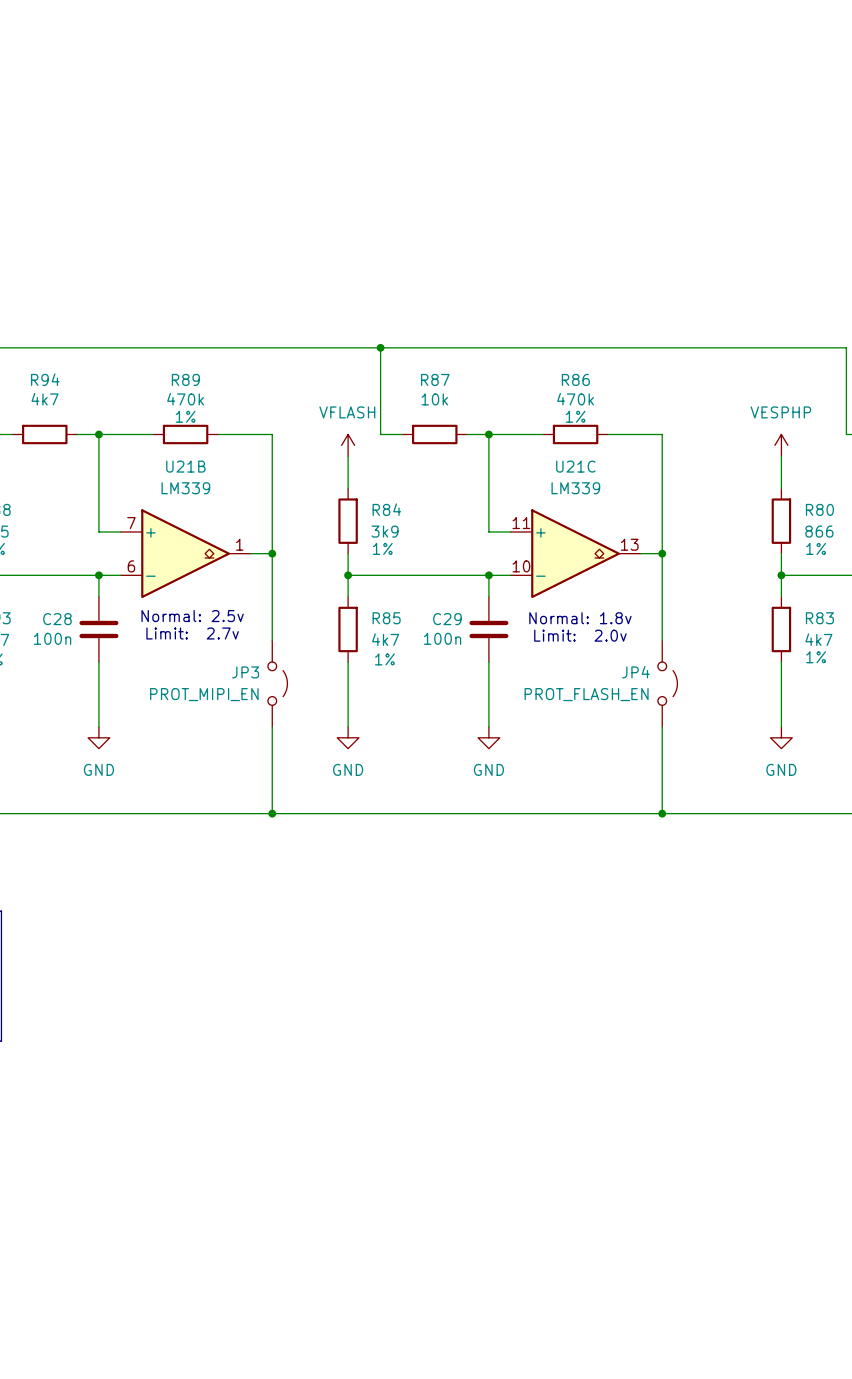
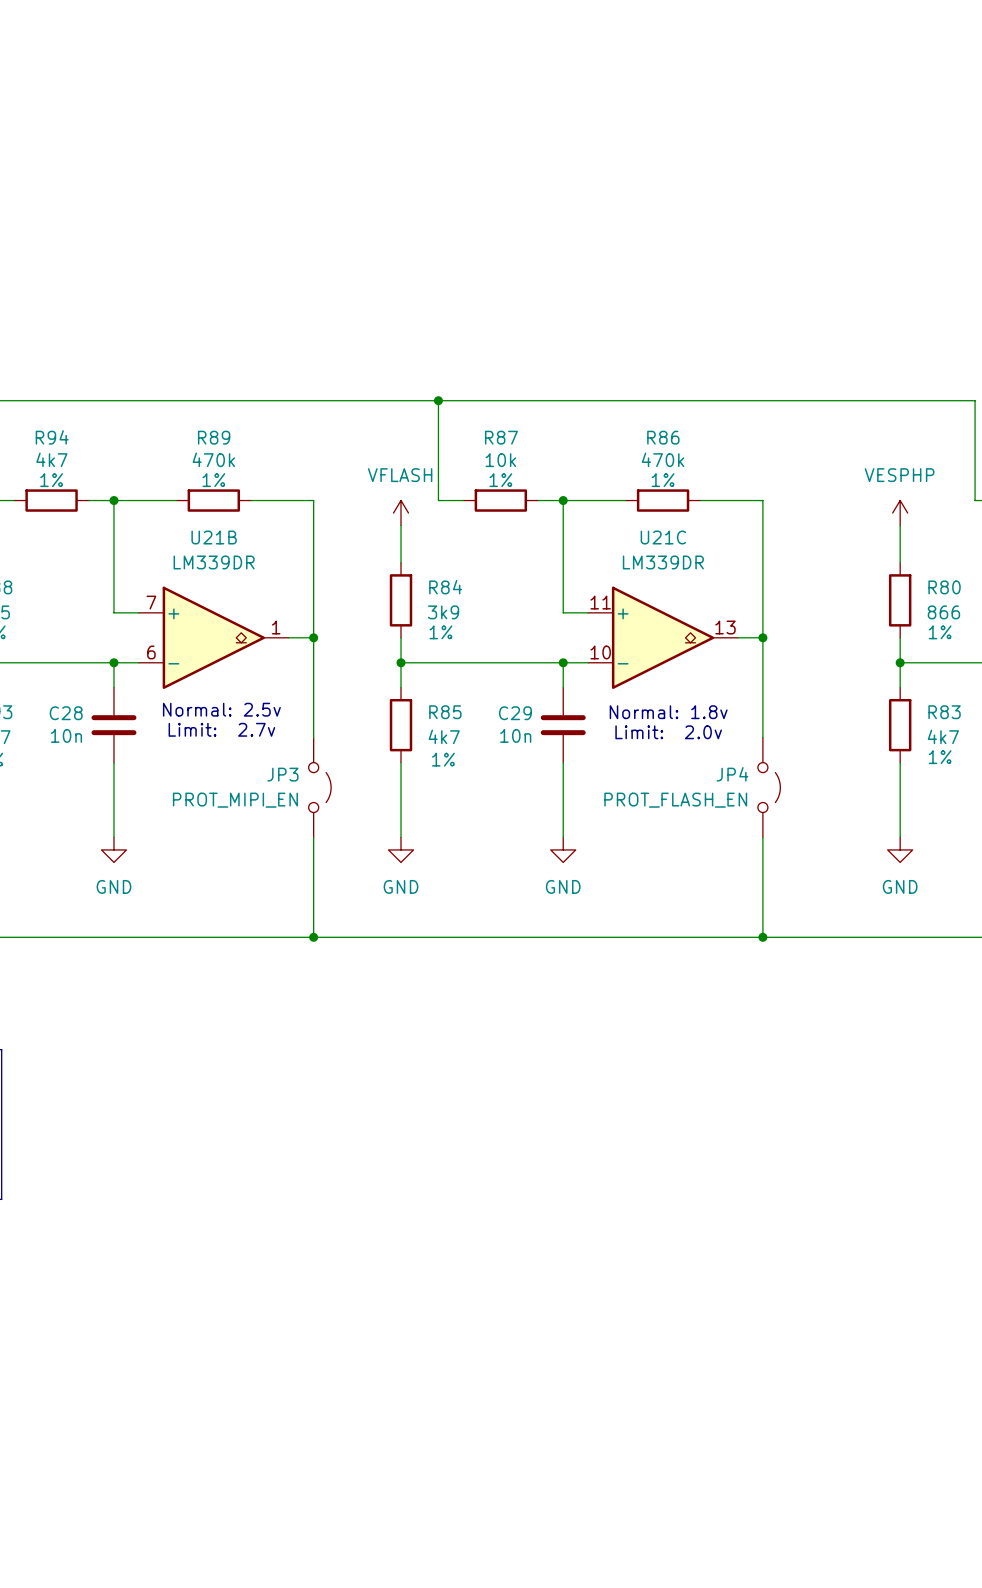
R94 text: none -> 1% (51, 480)
R87 text: none -> 1% (500, 480)
U21B value: LM339 (185, 488) -> LM339DR (214, 562)
U21C value: LM339 (575, 488) -> LM339DR (663, 562)
C28 value: 100n (52, 638) -> 10n (66, 735)
C29 value: 100n (442, 638) -> 10n (515, 735)

